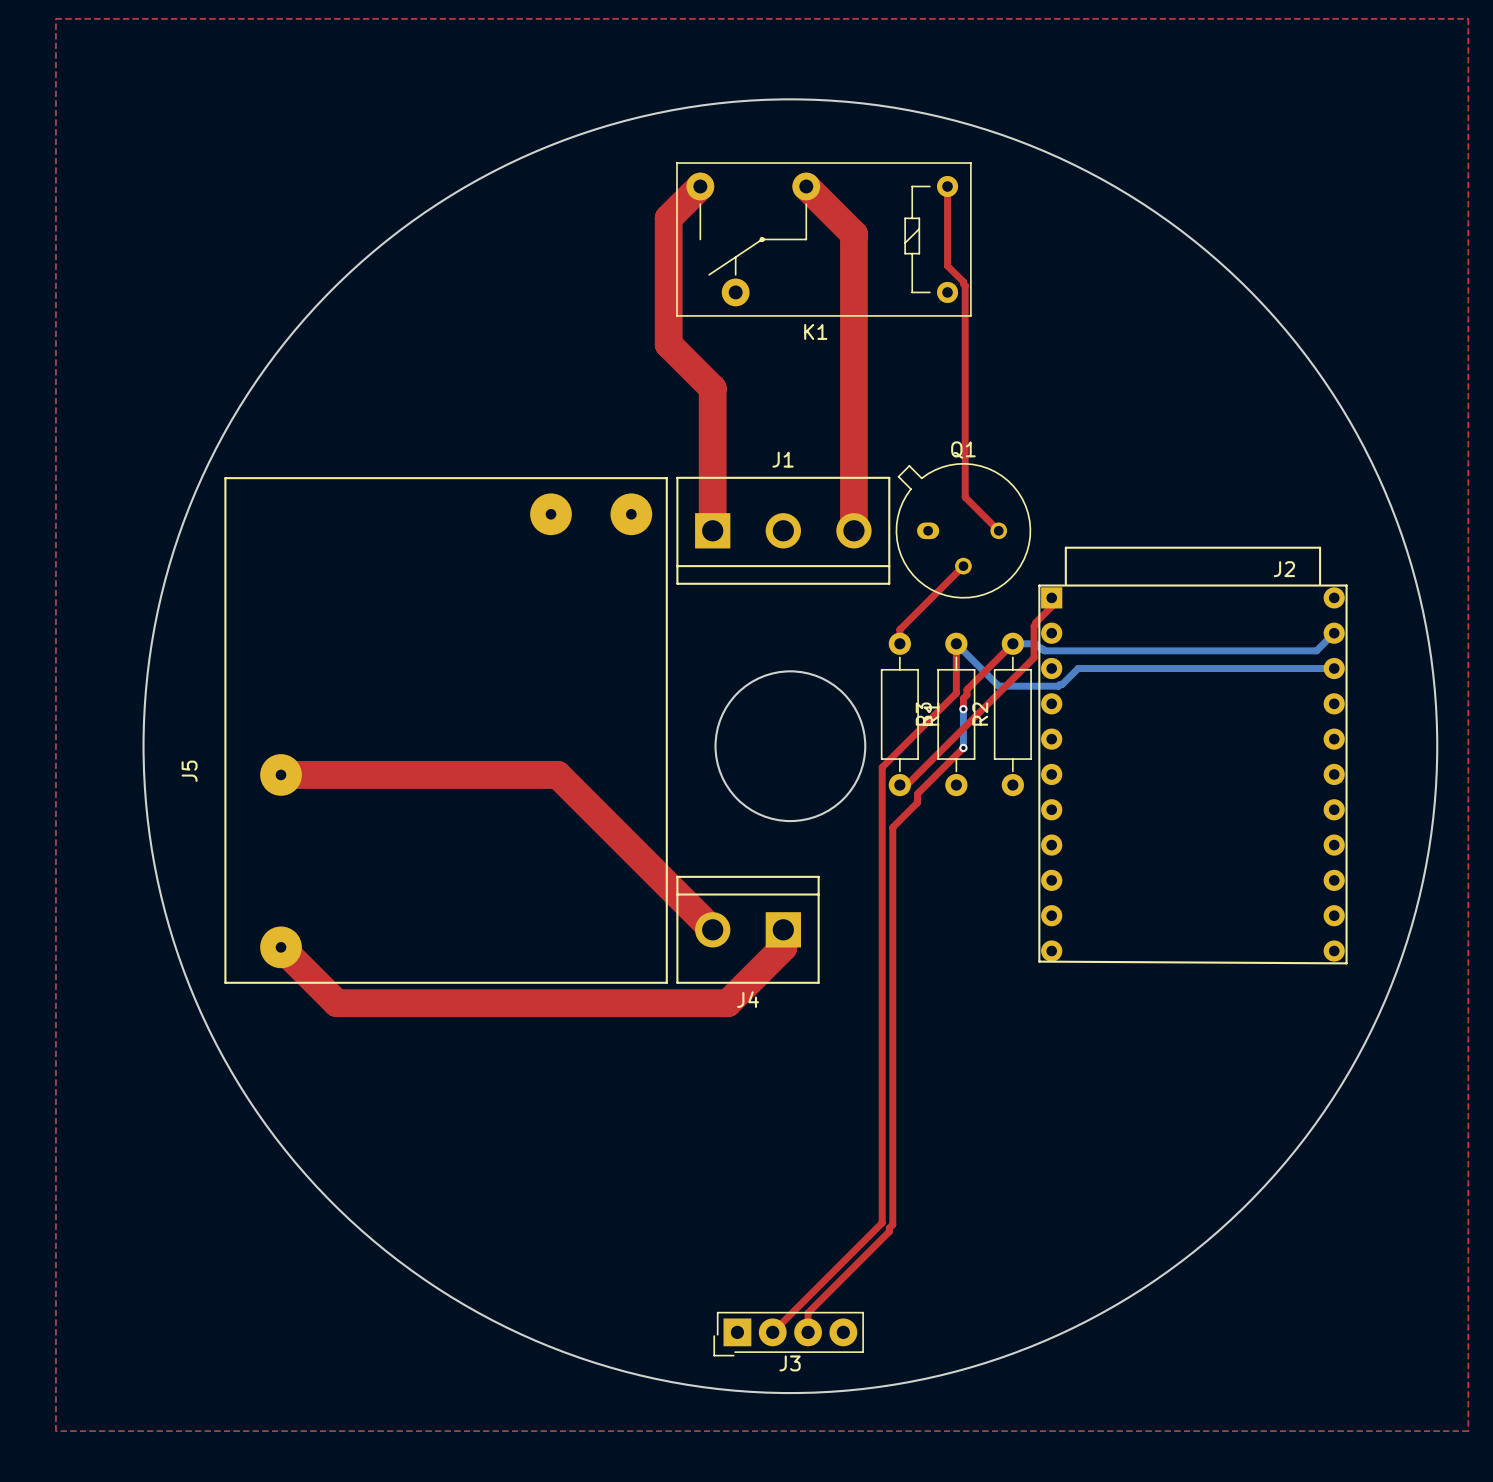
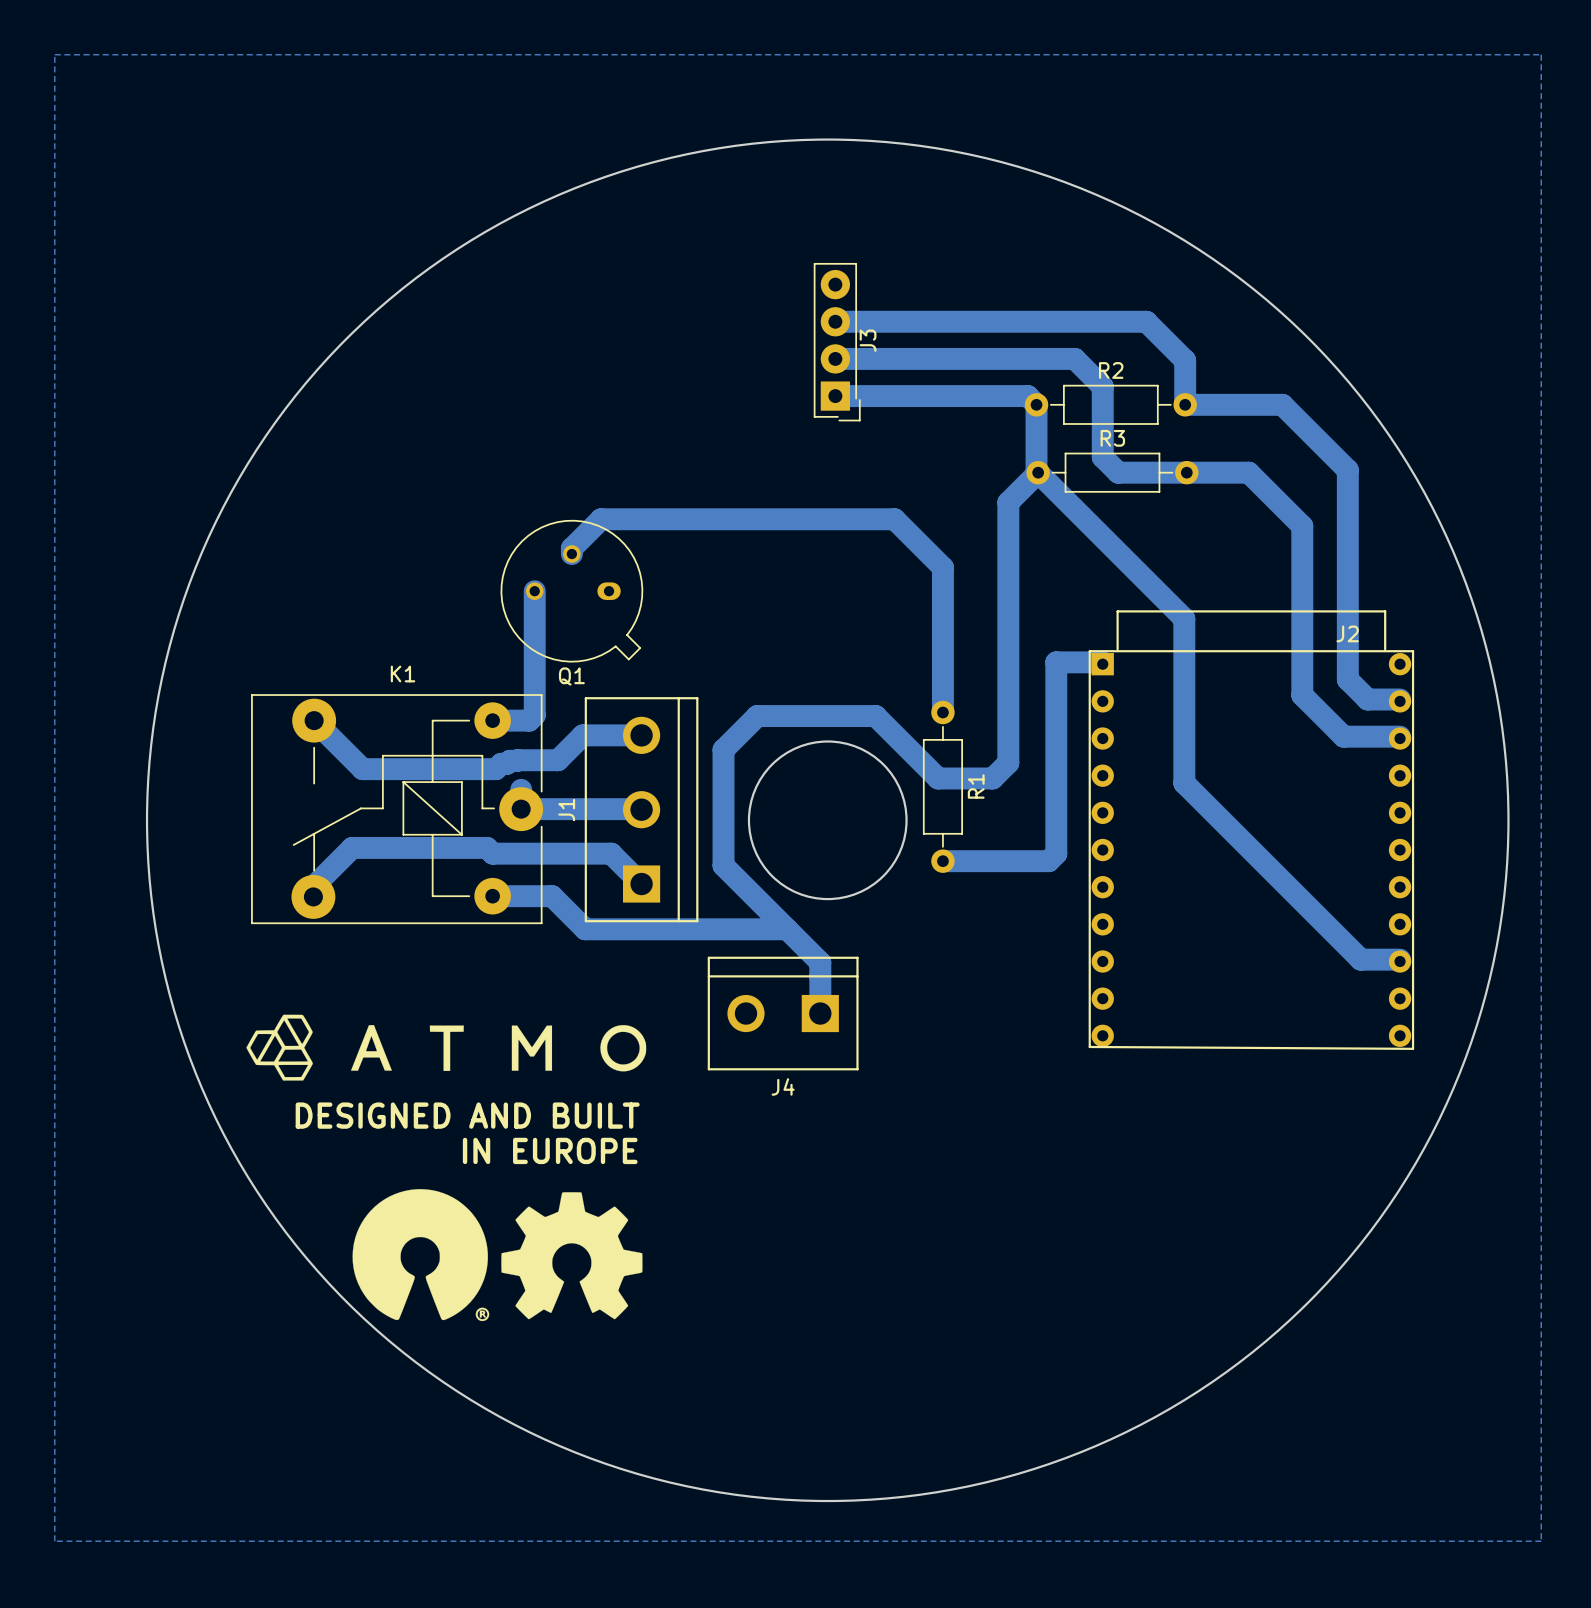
top zone outline: (55, 18) (55, 1431) (1468, 1431) (1468, 18) (55, 18) -> none
K1 footprint: [676, 162, 972, 317] -> [251, 694, 544, 925]
top track: (700, 186) (668, 218) (668, 344) (712, 388) (712, 530) (700, 518) -> none
top track: (806, 186) (853, 234) (853, 530) -> none
top track: (947, 186) (947, 265) (965, 285) (965, 497) (998, 530) -> none
bottom track: none -> (835, 321) (1146, 321) (1185, 360) (1185, 404) (1282, 404) (1347, 470) (1347, 679) (1367, 699) (1400, 699)
bottom track: none -> (835, 358) (1074, 358) (1102, 386) (1102, 457) (1118, 472) (1248, 472) (1302, 526) (1302, 695) (1343, 736) (1400, 736)
K1 name position: K1 (815, 331) -> K1 (403, 673)
bottom track: none -> (835, 396) (1027, 396) (1036, 404) (1036, 471) (1184, 618) (1184, 783) (1360, 959) (1400, 959)
bottom track: none -> (1038, 472) (1008, 502) (1008, 762) (992, 778) (938, 778) (875, 716) (757, 716) (723, 749) (723, 865) (820, 962) (820, 1013)
bottom track: none -> (571, 554) (571, 548) (601, 519) (894, 519) (942, 567) (942, 712)
bottom track: none -> (534, 591) (534, 715) (529, 720) (492, 720)
J1 rotation: 0° (783, 530) -> 90° counterclockwise (641, 809)
J1 position: (783, 530) -> (641, 809)
Q1 rotation: 0° (963, 530) -> 180° (571, 591)
Q1 position: (963, 530) -> (571, 591)
top track: (963, 566) (899, 629) (899, 643) -> none
bottom track: none -> (1102, 662) (1056, 662) (1056, 853) (1048, 861) (942, 861)
top track: (1051, 597) (1051, 606) (1034, 626) (1034, 657) (906, 785) (899, 785) -> none
bottom track: (1334, 633) (1316, 650) (1044, 650) (1035, 643) (1012, 643) -> none
top track: (956, 643) (956, 693) (882, 767) (882, 1222) (772, 1332) -> none
bottom track: (956, 643) (998, 686) (1058, 686) (1078, 668) (1334, 668) -> none
top track: (1012, 643) (966, 689) (966, 695) (963, 698) (963, 709) -> none
bottom track: none -> (314, 720) (362, 769) (495, 769) (501, 763) (506, 763) (509, 760) (558, 760) (582, 735) (641, 735)
bottom track: (963, 709) (963, 747) -> none
via: (963, 709) -> none
R3 rotation: 0° (956, 714) -> 90° clockwise (1112, 472)
R3 position: (956, 714) -> (1112, 472)
R2 rotation: 0° (1012, 714) -> 90° clockwise (1110, 404)
R2 position: (1012, 714) -> (1110, 404)
bottom track: none -> (521, 789) (521, 809) (641, 809)
J5: (446, 730) -> none
top track: (963, 747) (917, 793) (917, 802) (892, 827) (892, 1224) (889, 1228) (889, 1231) (808, 1312) (808, 1332) -> none
via: (963, 747) -> none
top track: (281, 774) (557, 774) (712, 929) -> none
bottom track: none -> (641, 884) (611, 853) (492, 853) (487, 847) (352, 847) (313, 886) (313, 896)
bottom track: none -> (492, 896) (552, 896) (585, 929) (787, 929)
top track: (783, 929) (783, 947) (727, 1003) (336, 1003) (281, 947) -> none
drawing: none -> [246, 1014, 647, 1081]
text: none -> DESIGNED AND BUILT (467, 1115)
text: none -> IN EUROPE (550, 1150)
drawing: none -> [352, 1189, 643, 1322]
J3 rotation: 0° (788, 1334) -> 90° counterclockwise (837, 342)
J3 position: (788, 1334) -> (837, 342)

